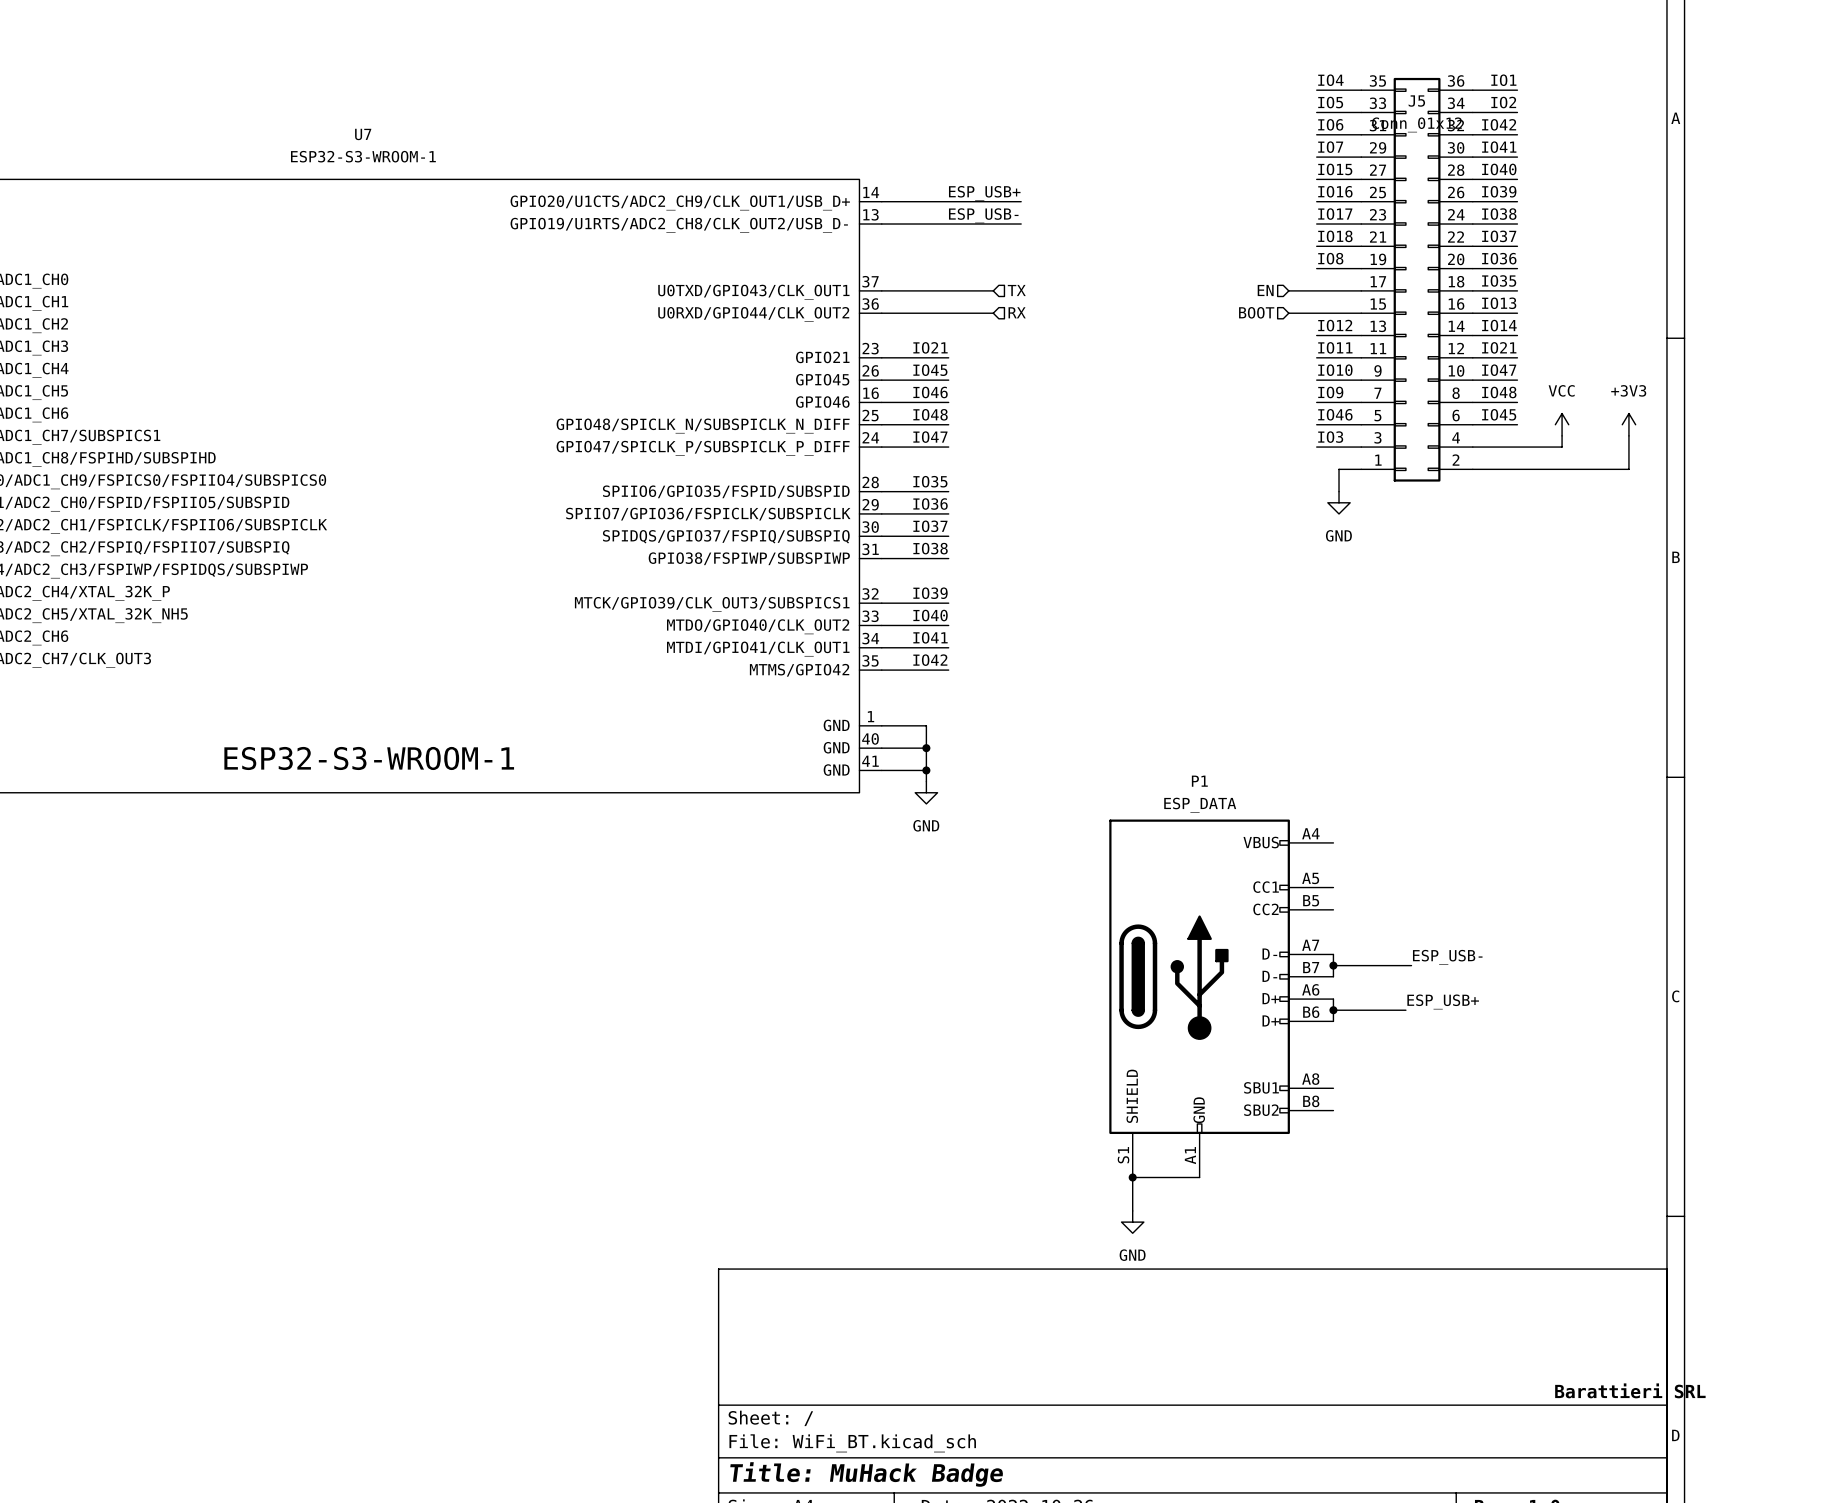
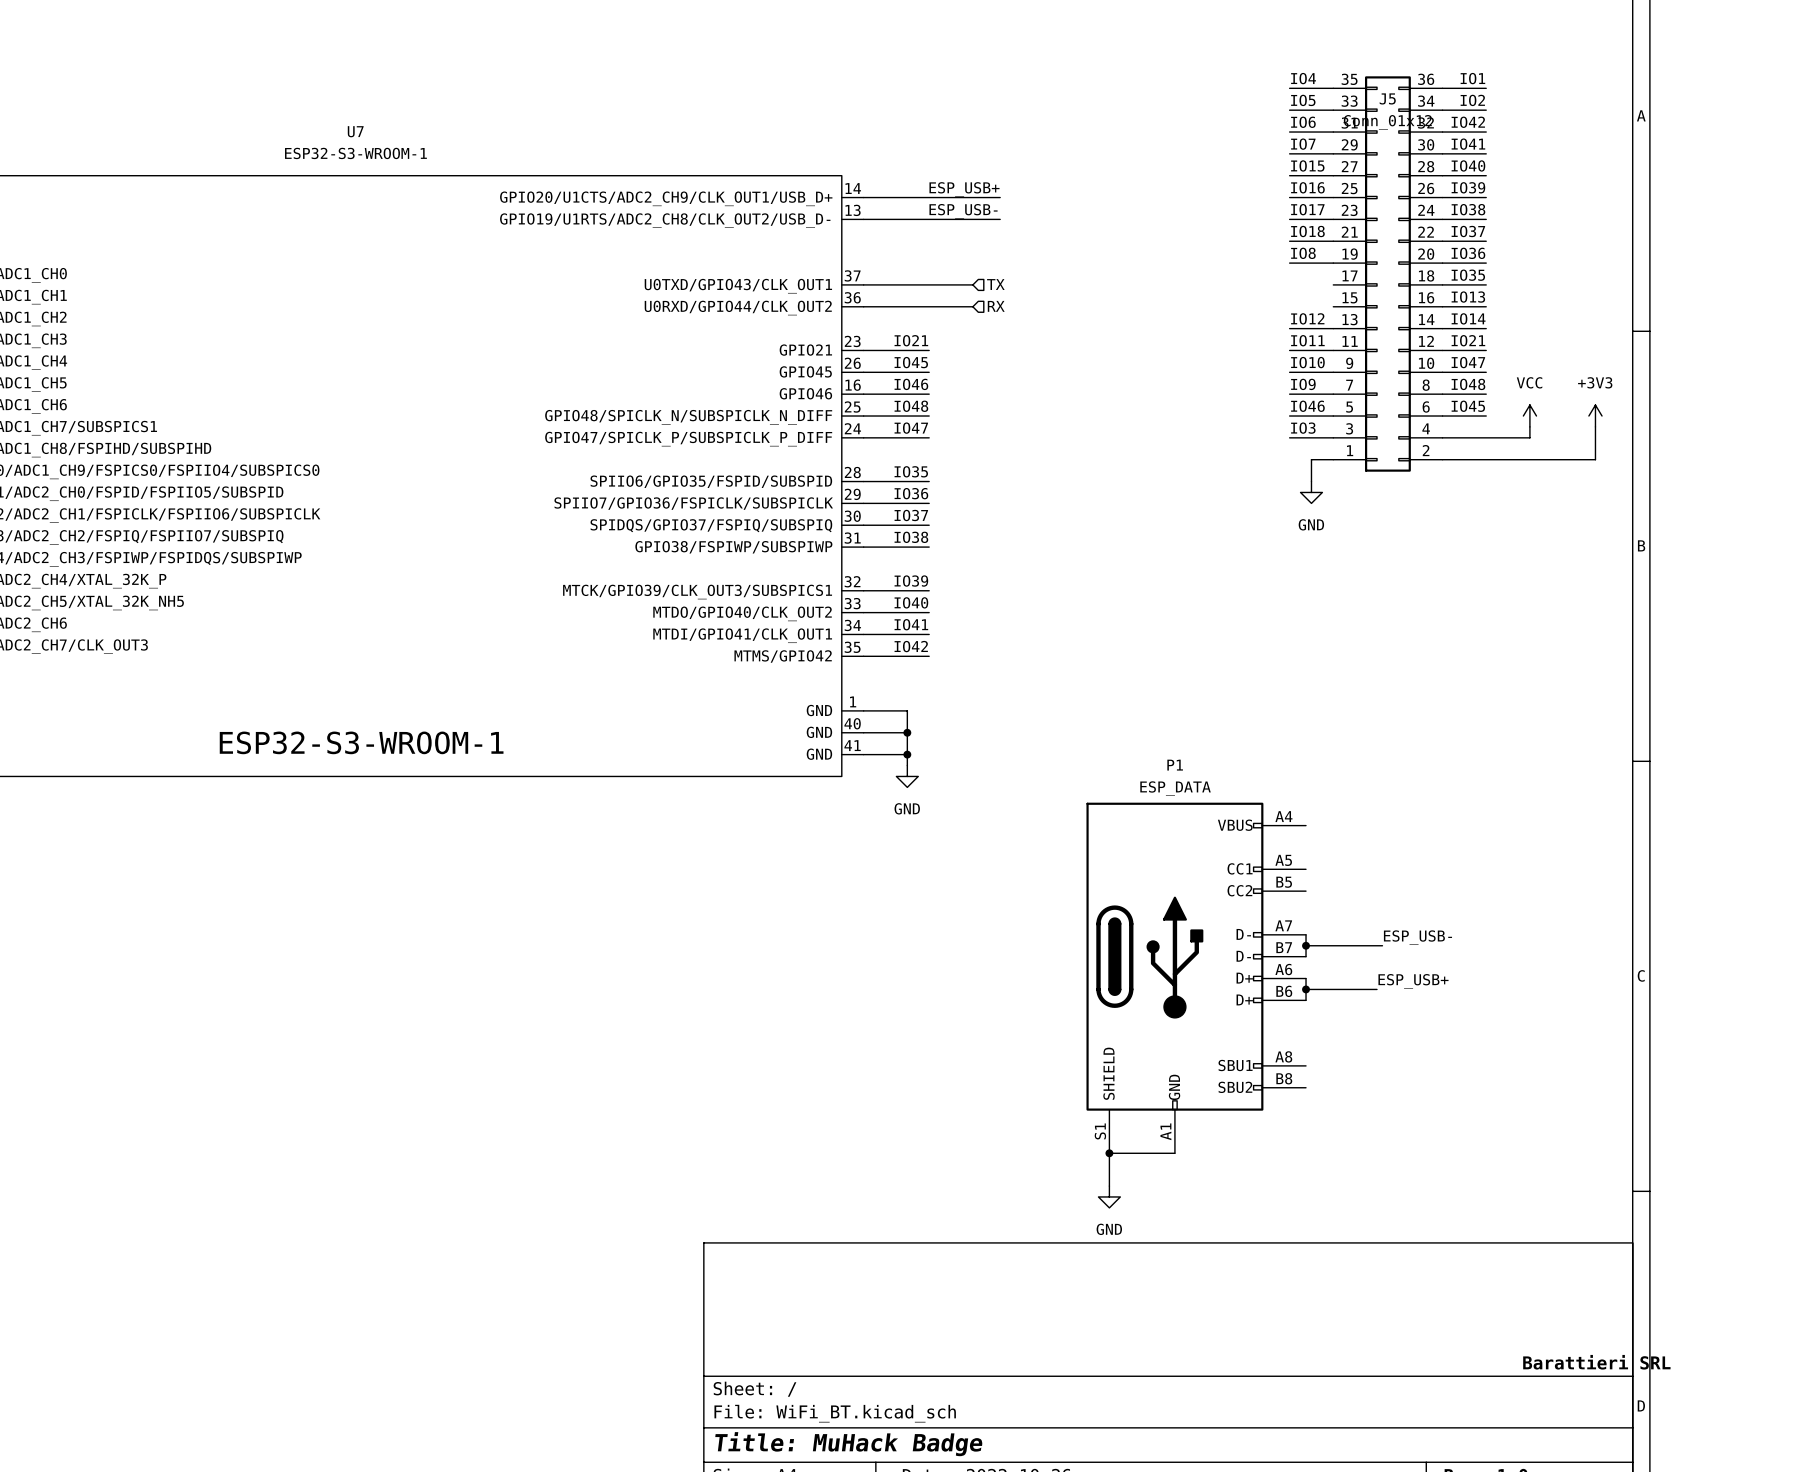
hierarchical label: EN (1265, 290) -> none
wire: (1288, 290) (1361, 290) -> none
hierarchical label: BOOT (1256, 312) -> none
wire: (1288, 313) (1361, 313) -> none

